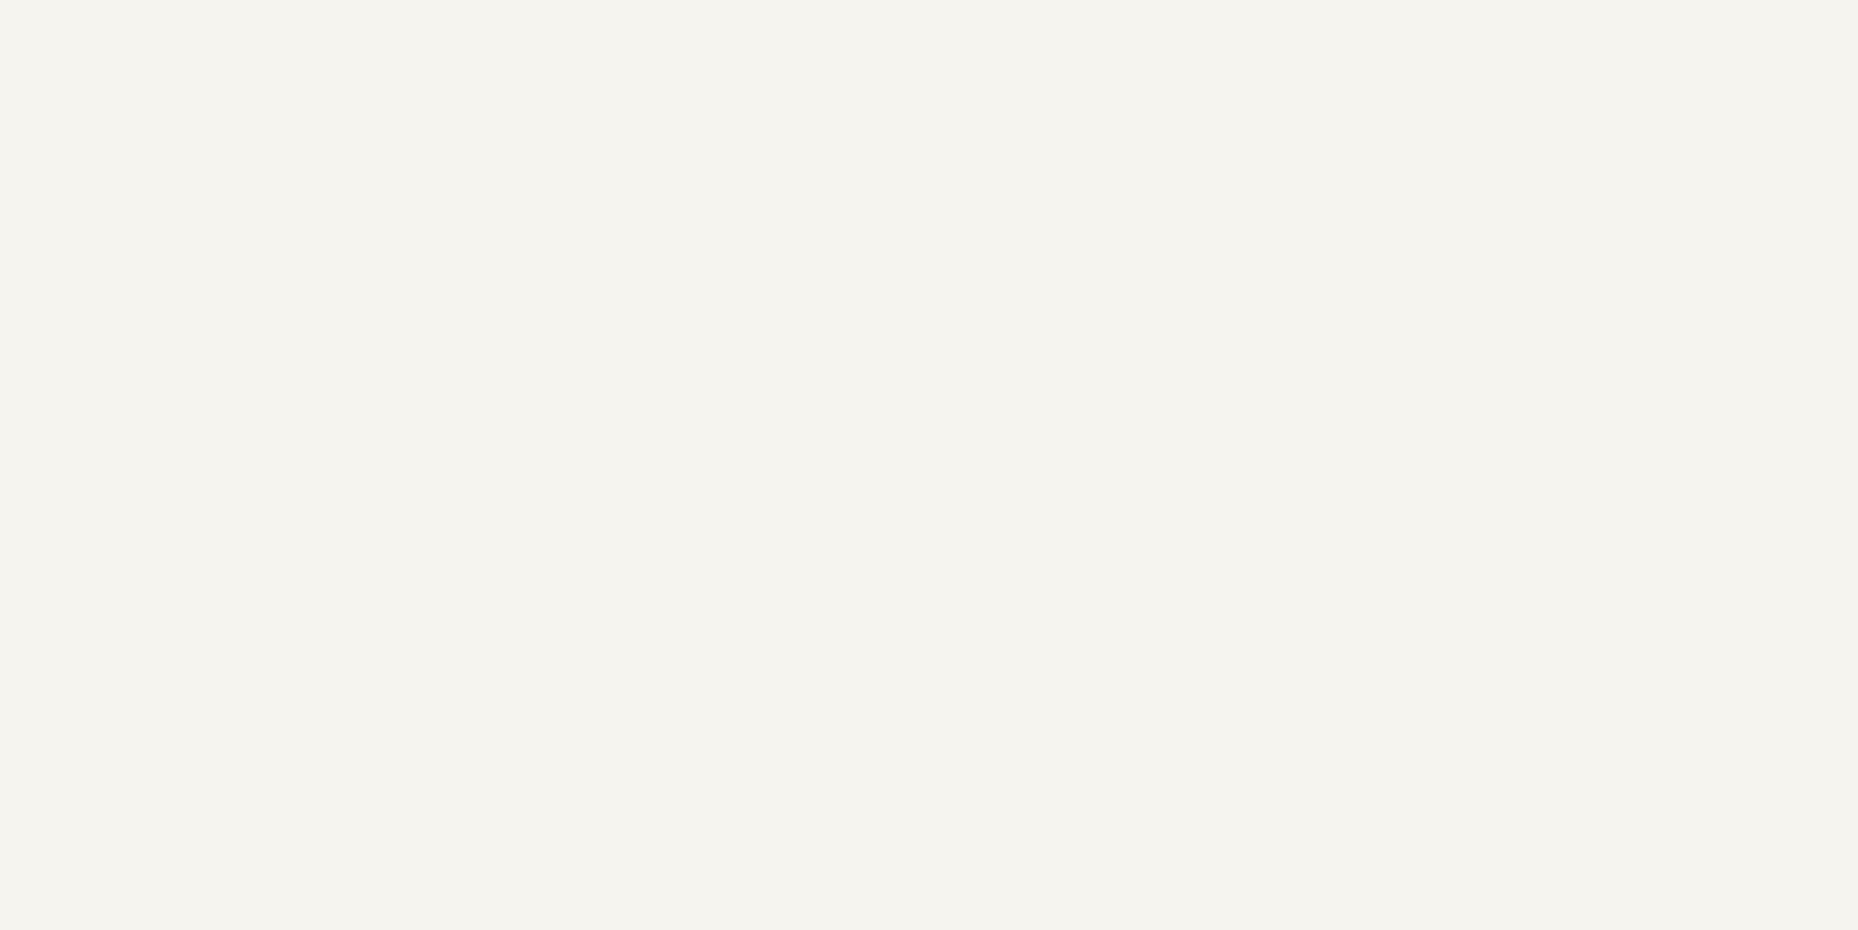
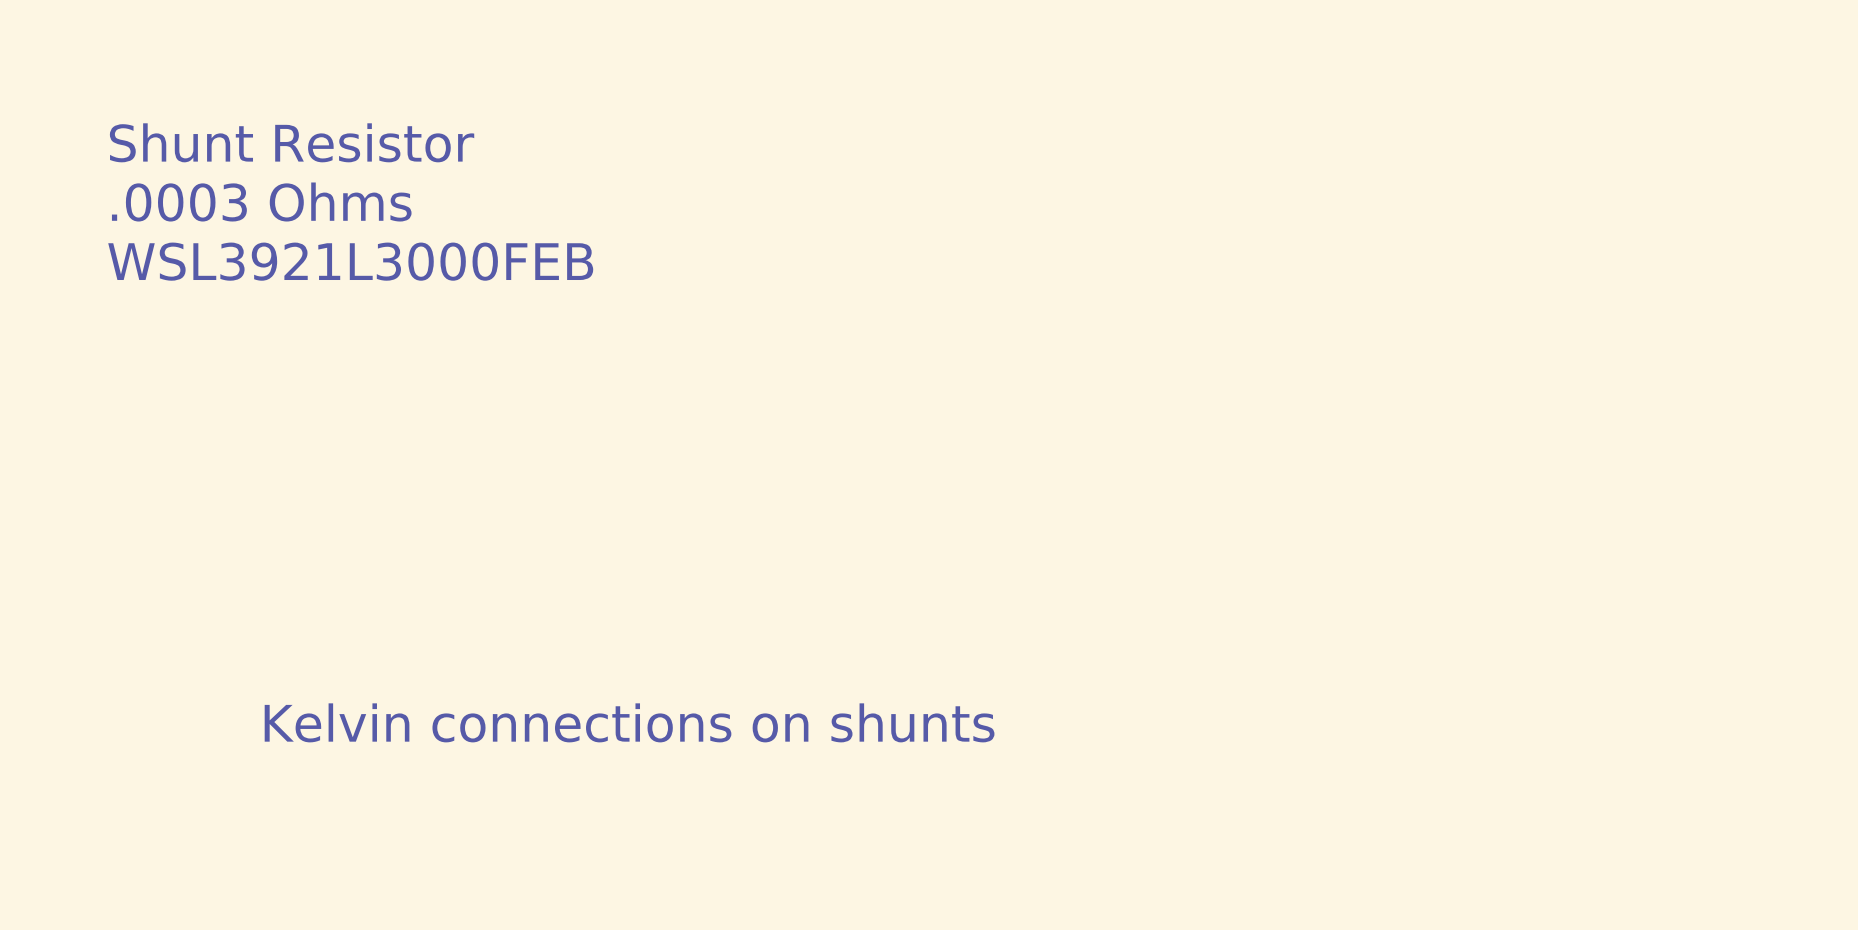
text: none -> Shunt Resistor (292, 142)
text: none -> .0003 Ohms (261, 202)
text: none -> WSL3921L3000FEB (350, 261)
text: none -> Kelvin connections on shunts (629, 722)

